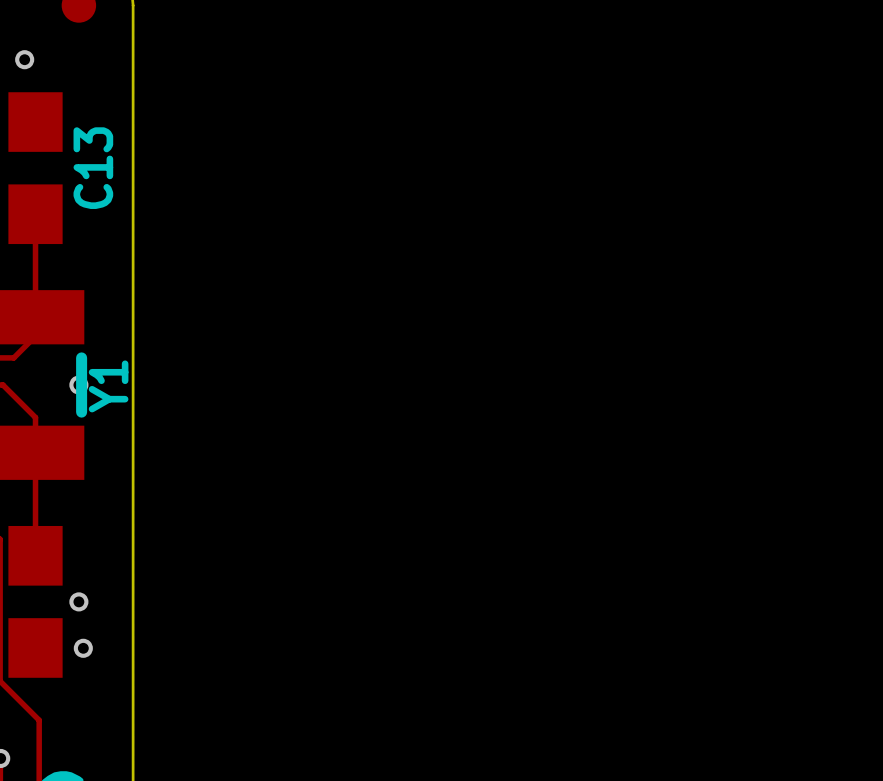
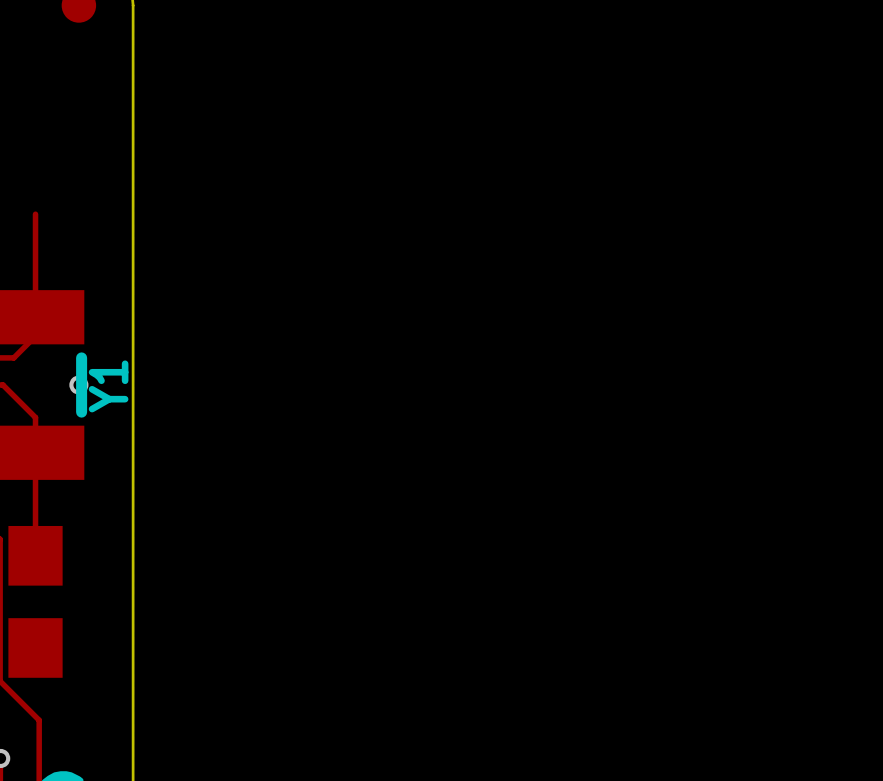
via: (24, 59) -> none
C13: (35, 168) -> none
via: (78, 601) -> none
via: (83, 648) -> none

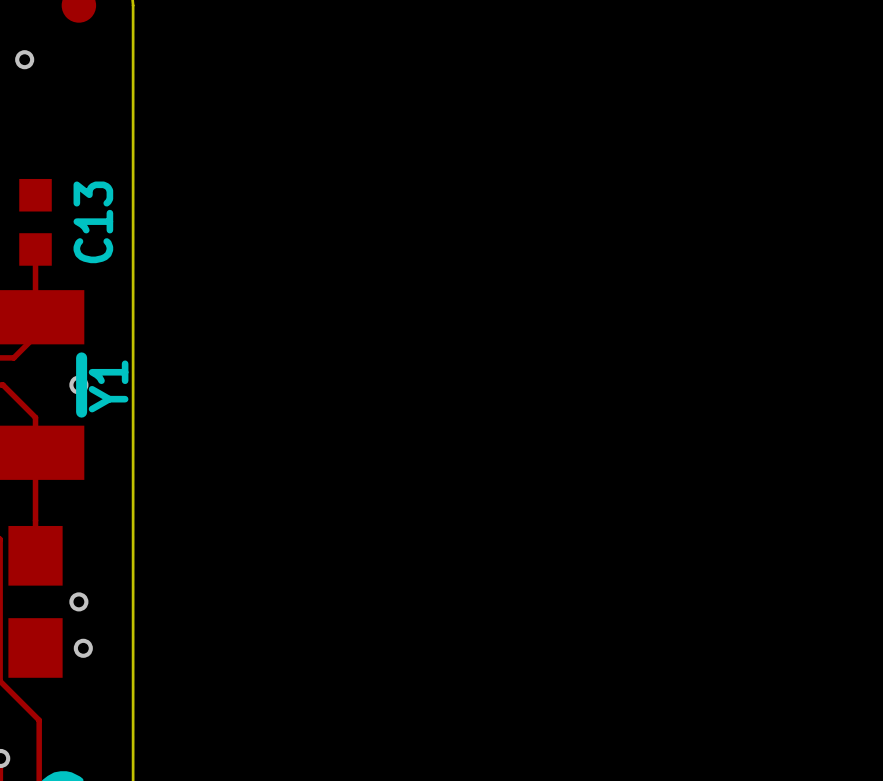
via: none -> (24, 59)
track: (35, 214) (35, 249) -> none
C13: none -> (35, 222)
via: none -> (78, 601)
via: none -> (83, 648)

